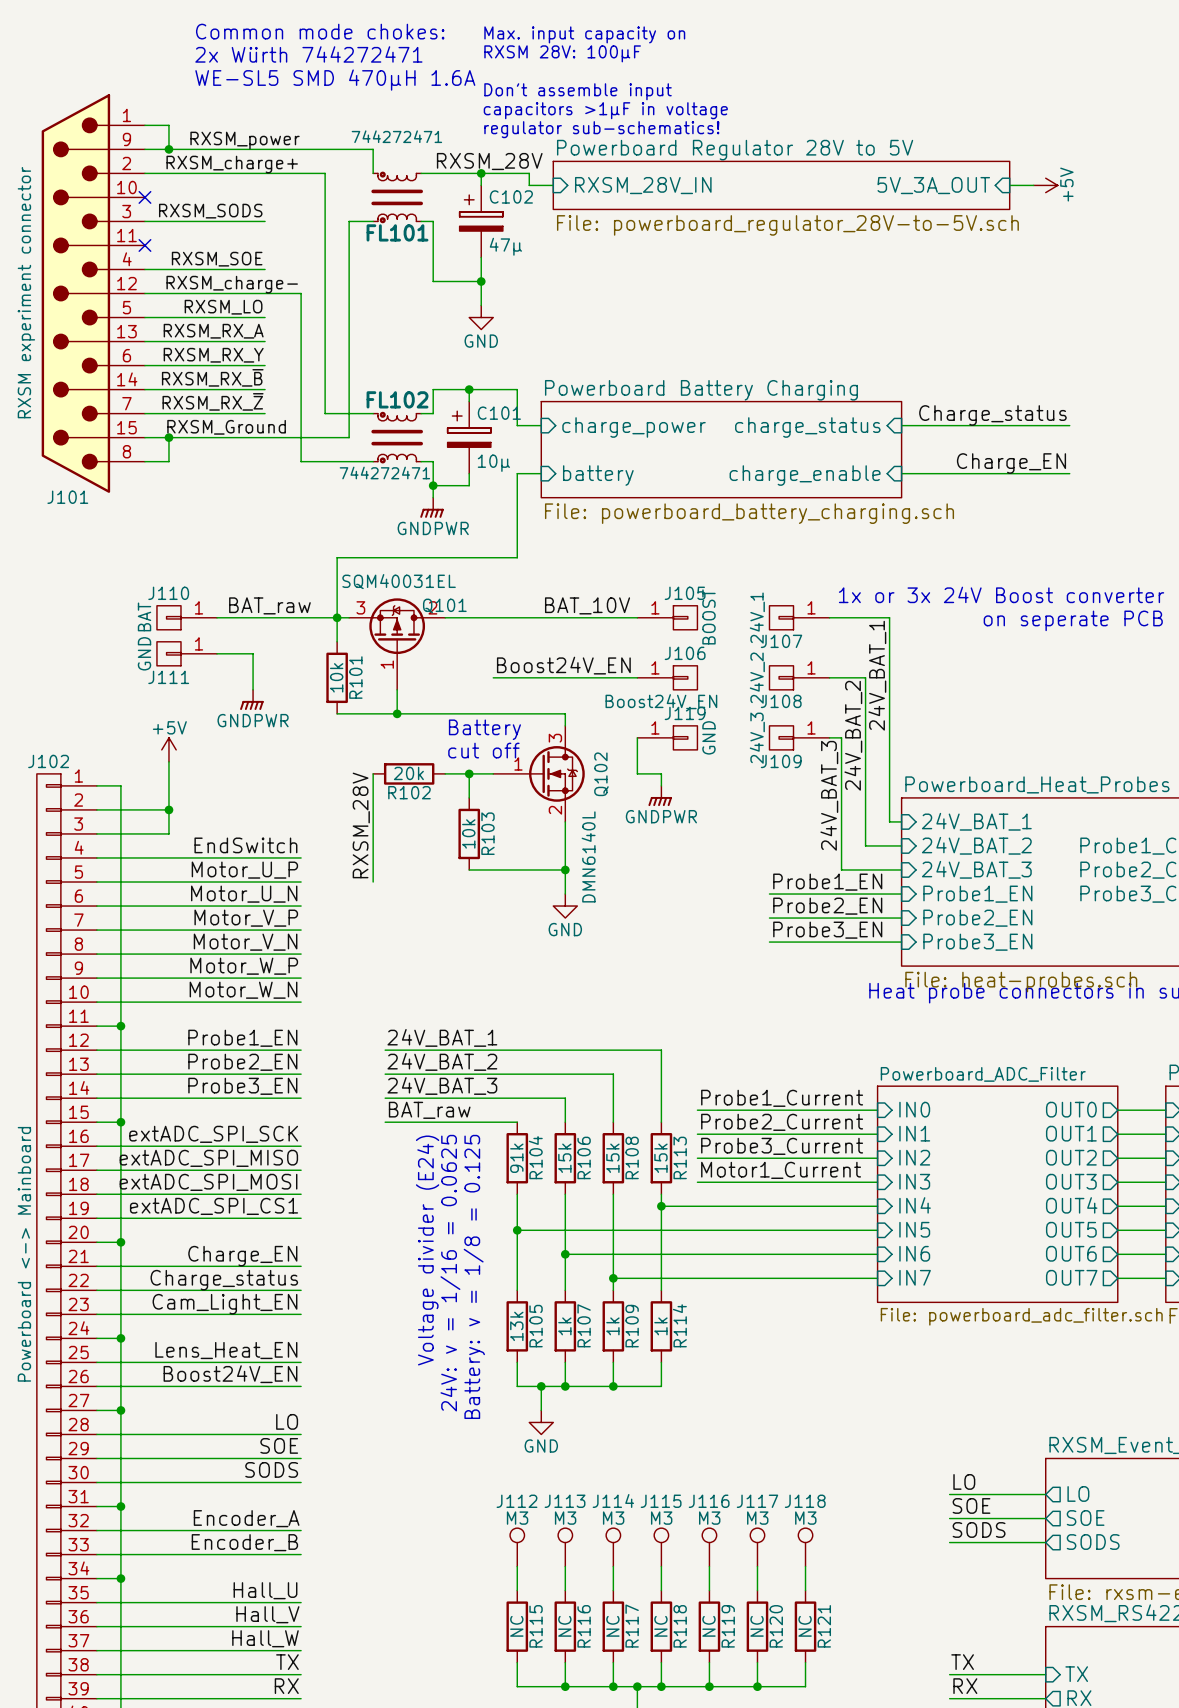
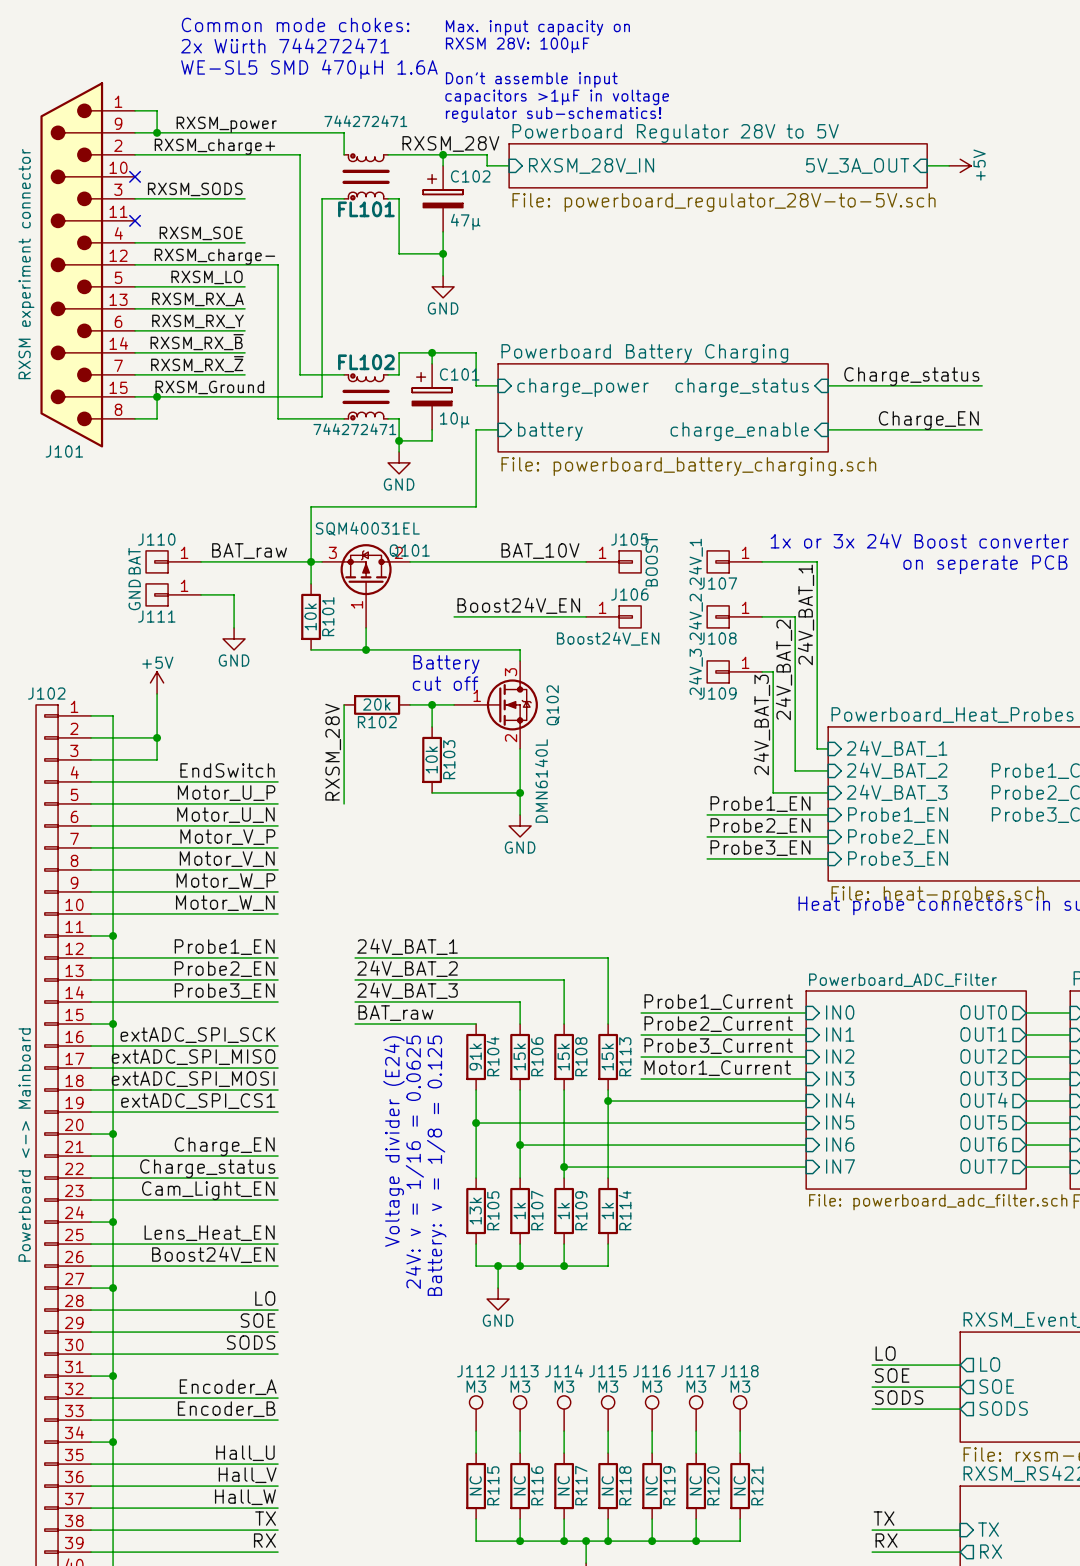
power symbol: GNDPWR (432, 507) -> GND (399, 462)
power symbol: GNDPWR (251, 699) -> GND (234, 638)
wire: (637, 737) (637, 773) (661, 773) (661, 785) -> none
J119: GND (667, 737) -> none
power symbol: GNDPWR (660, 796) -> none

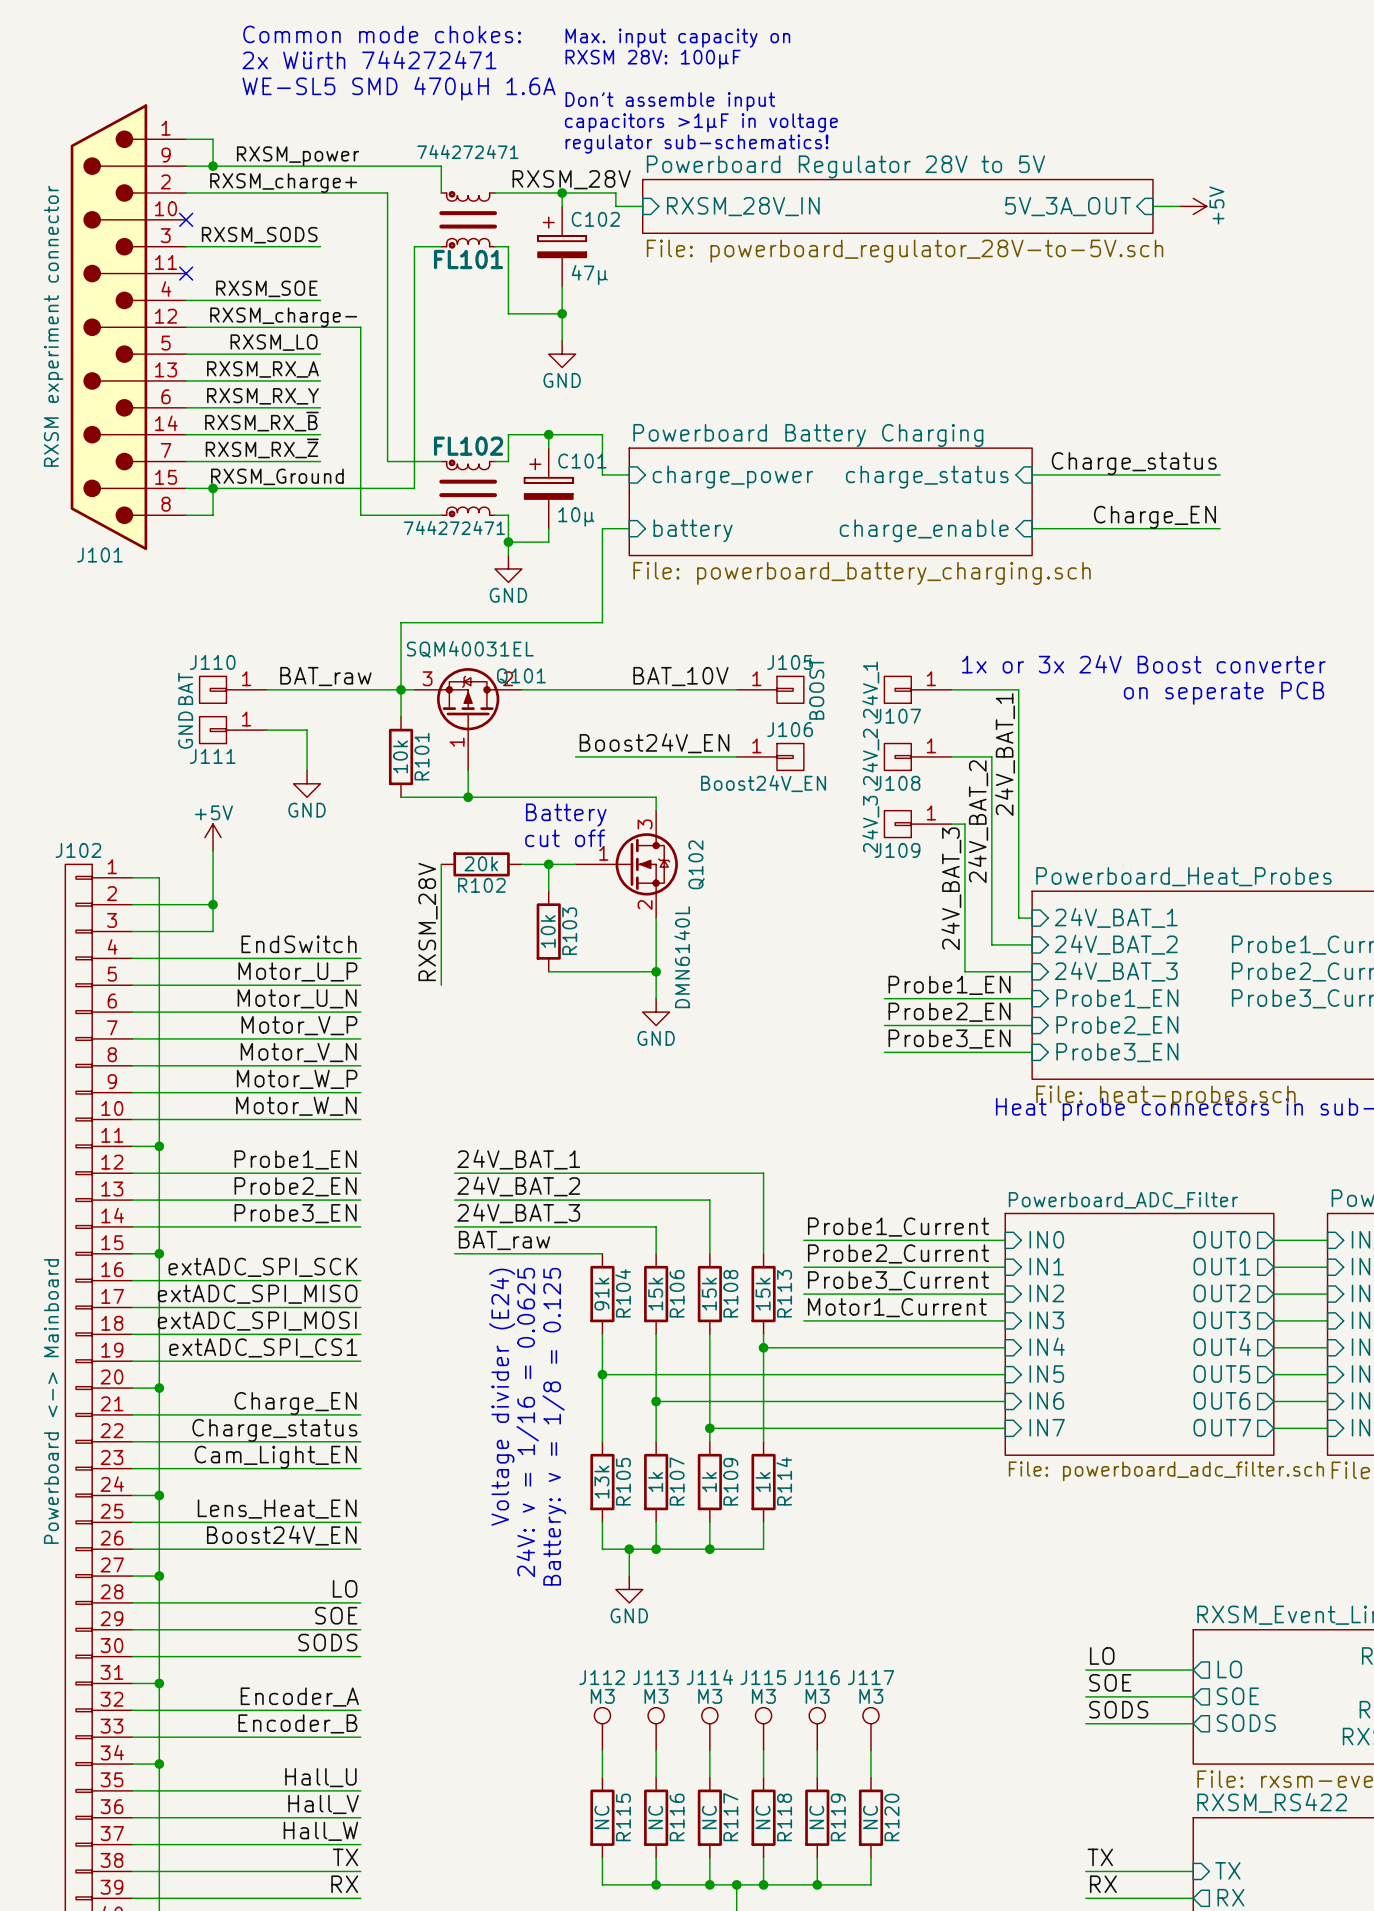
J118: M3 (740, 1413) -> none
wire: (740, 1431) (740, 1453) -> none
R121: NC (740, 1486) -> none
wire: (740, 1519) (740, 1541) (696, 1541) -> none
junction: (696, 1541) -> none

